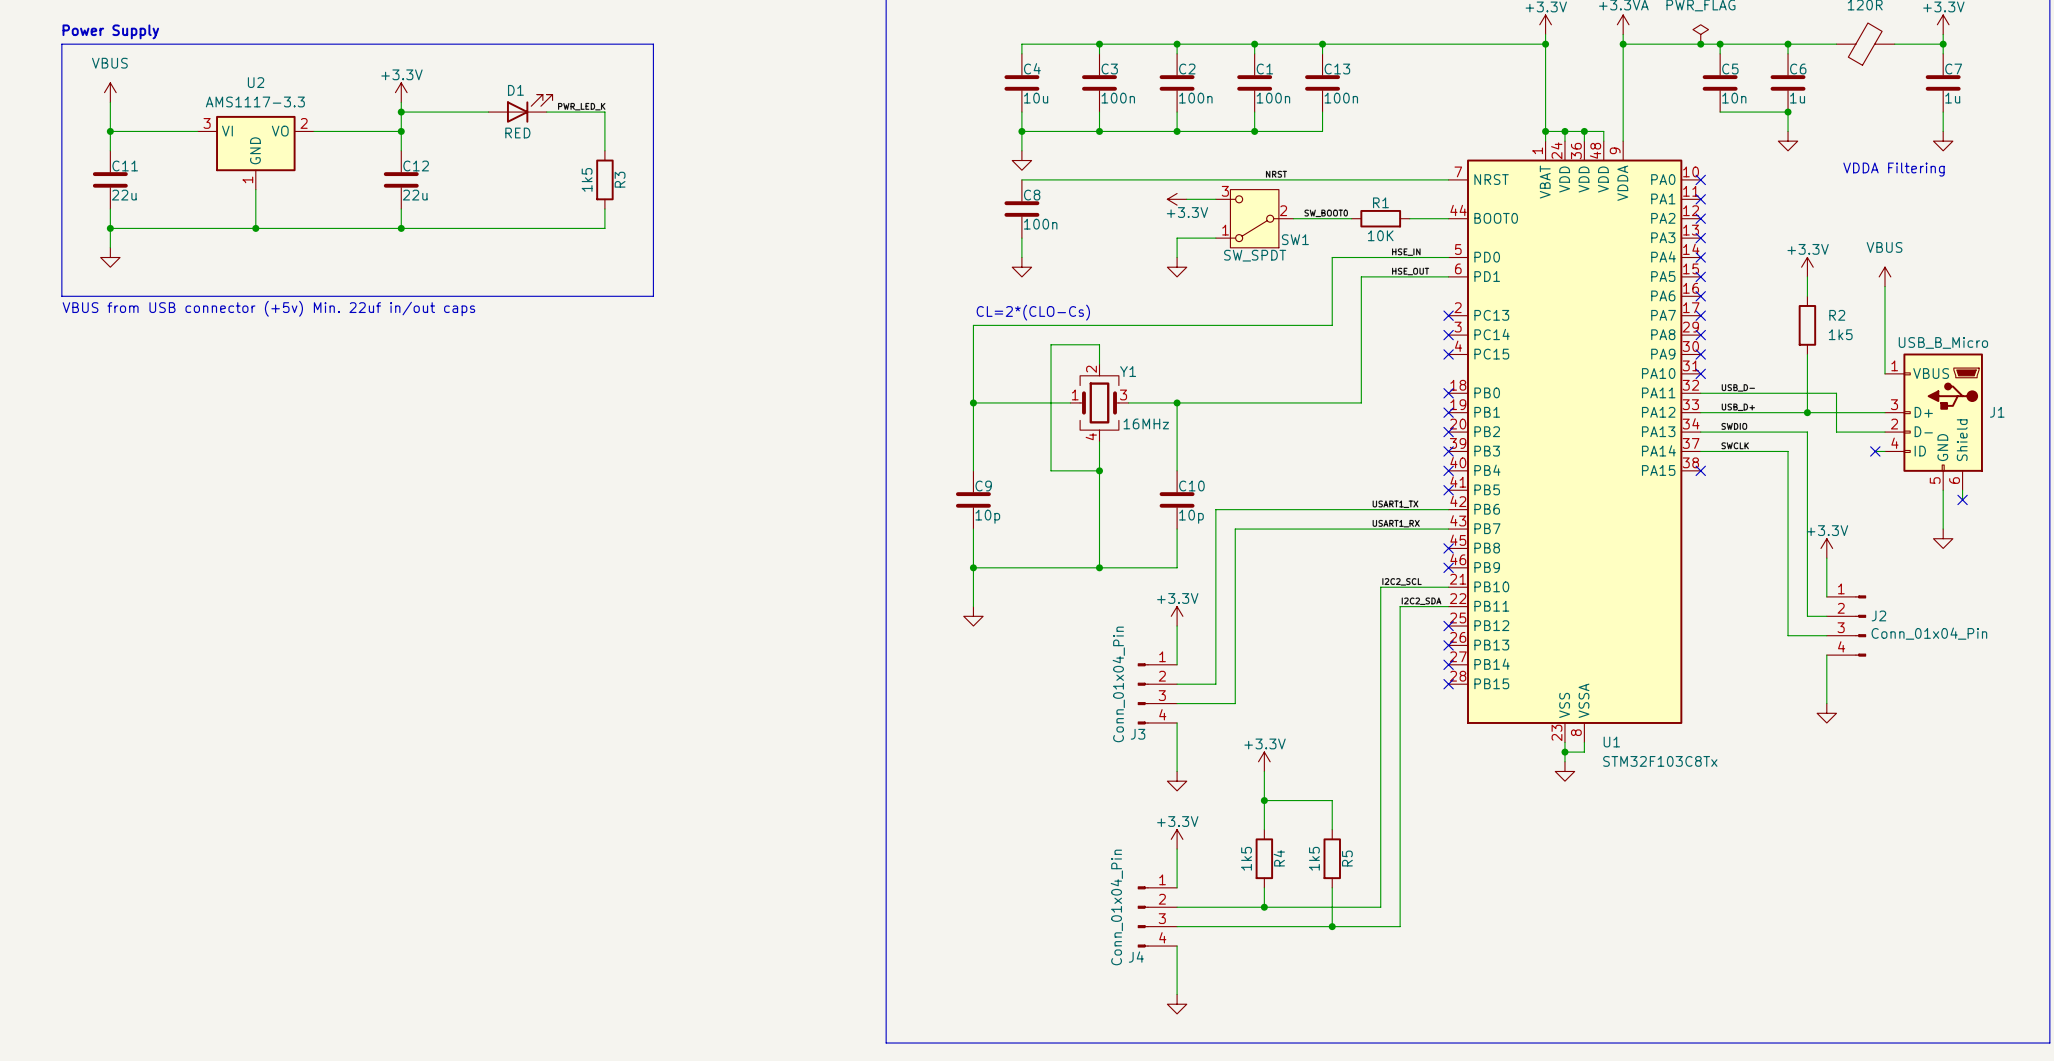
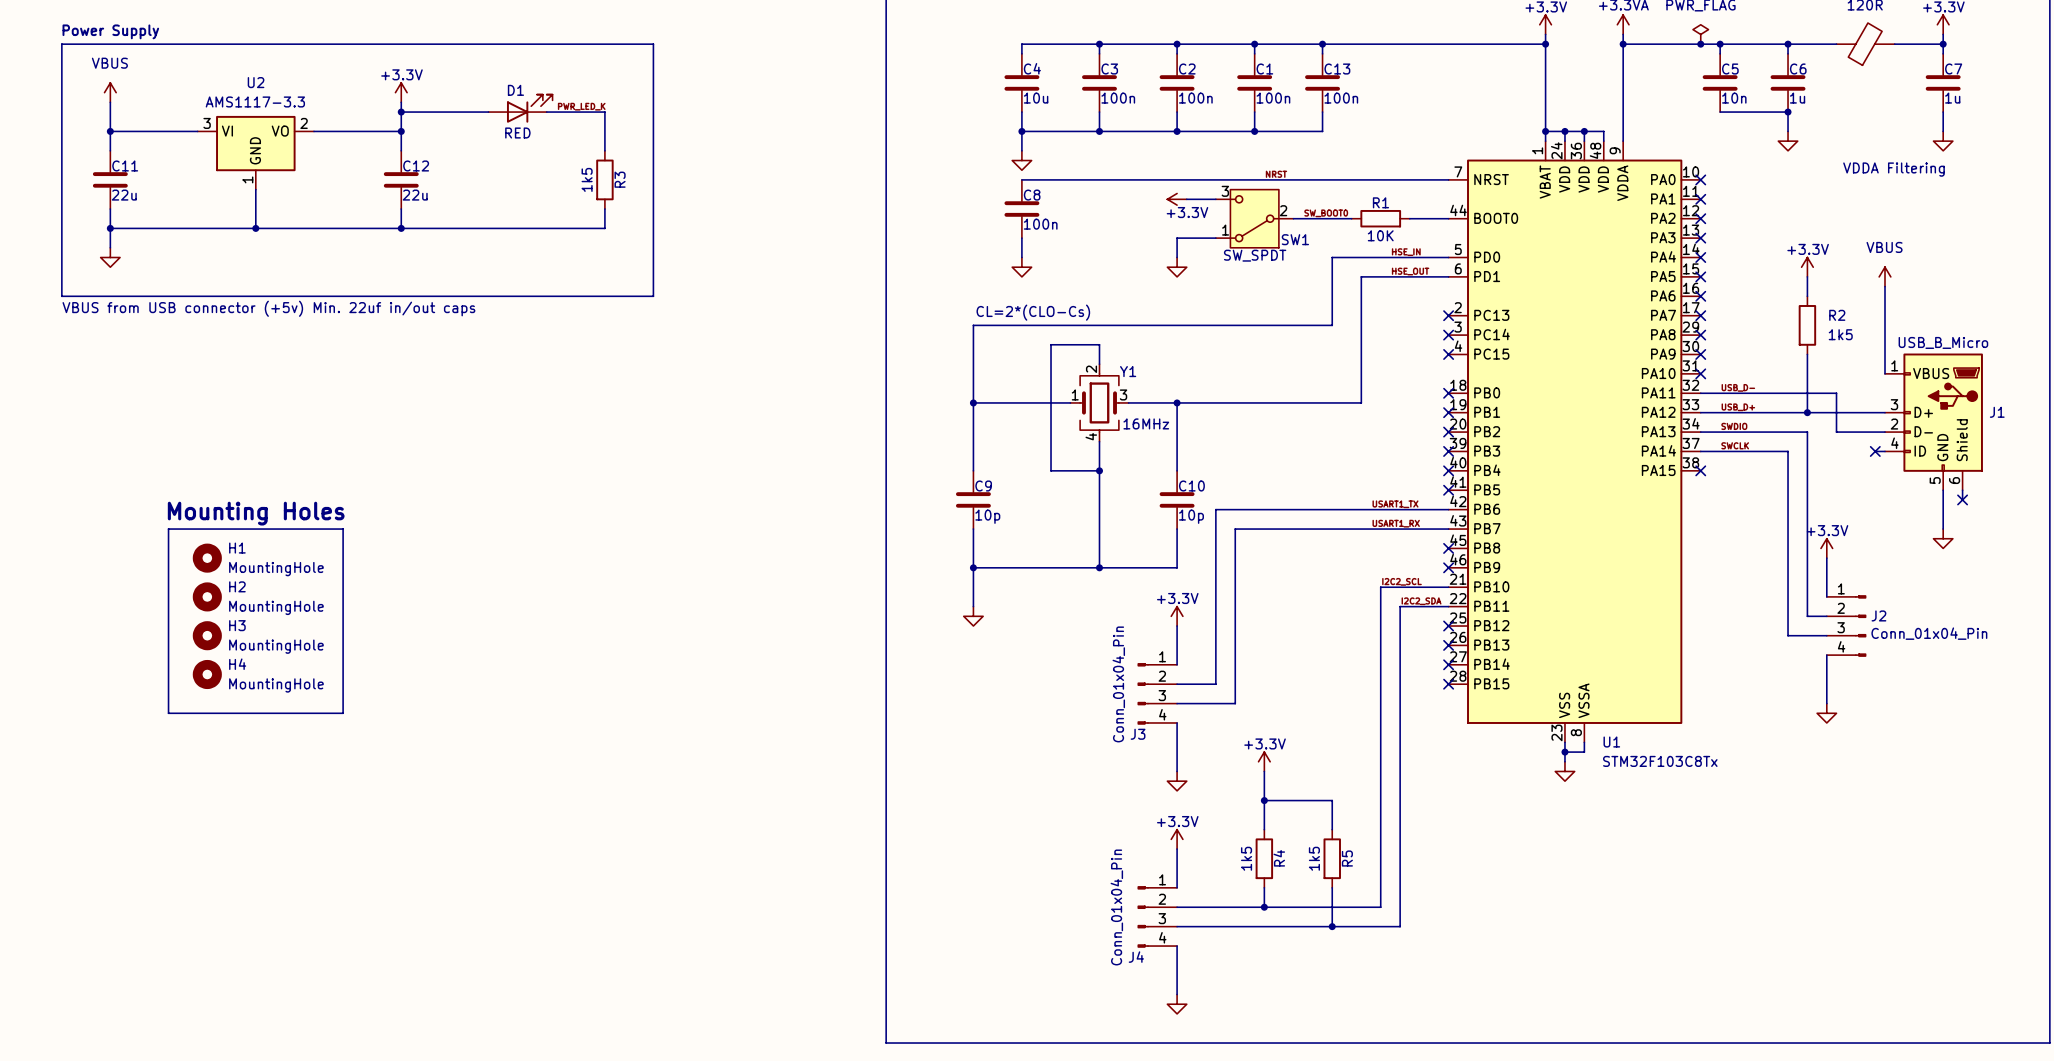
text: none -> Mounting Holes (256, 513)
line: none -> (168, 529) (168, 713) (343, 713) (343, 529) (168, 529)
H1: none -> MountingHole (207, 558)
H2: none -> MountingHole (207, 596)
H3: none -> MountingHole (207, 635)
H4: none -> MountingHole (207, 674)

